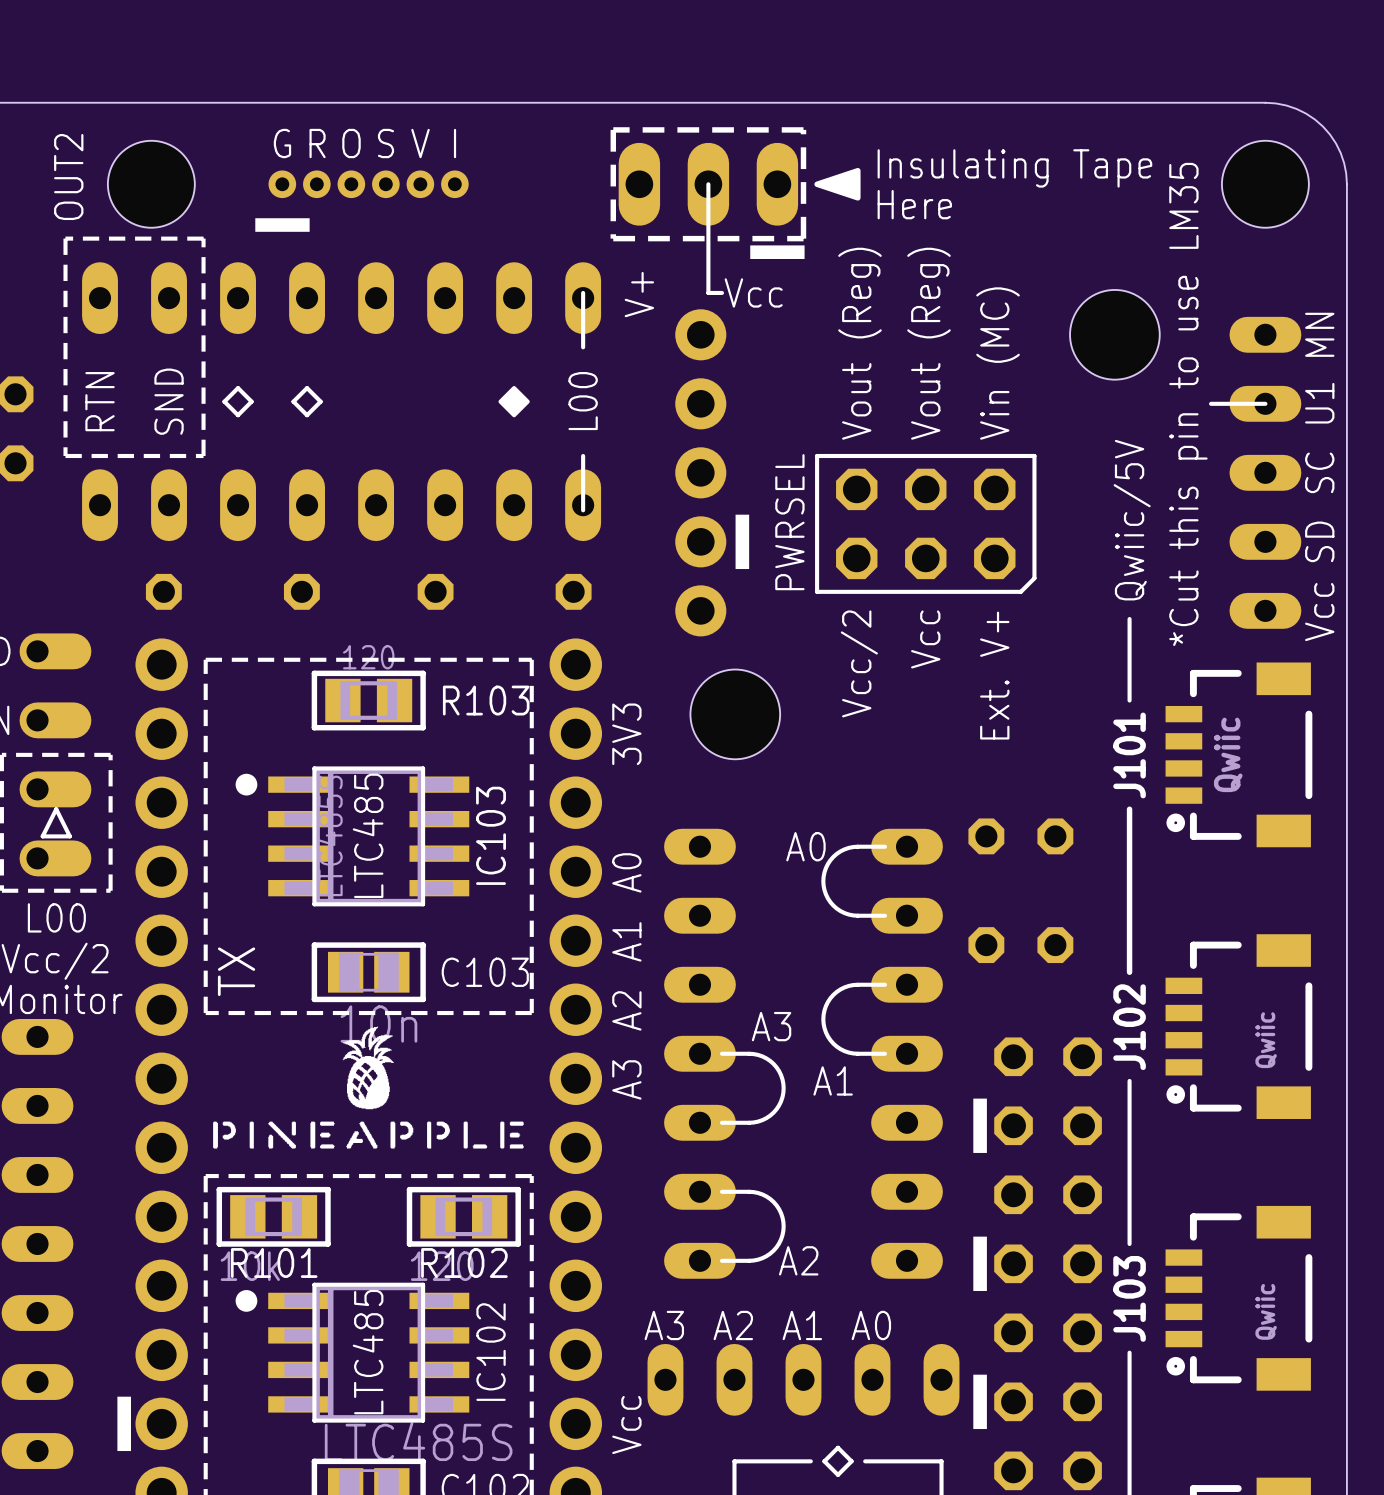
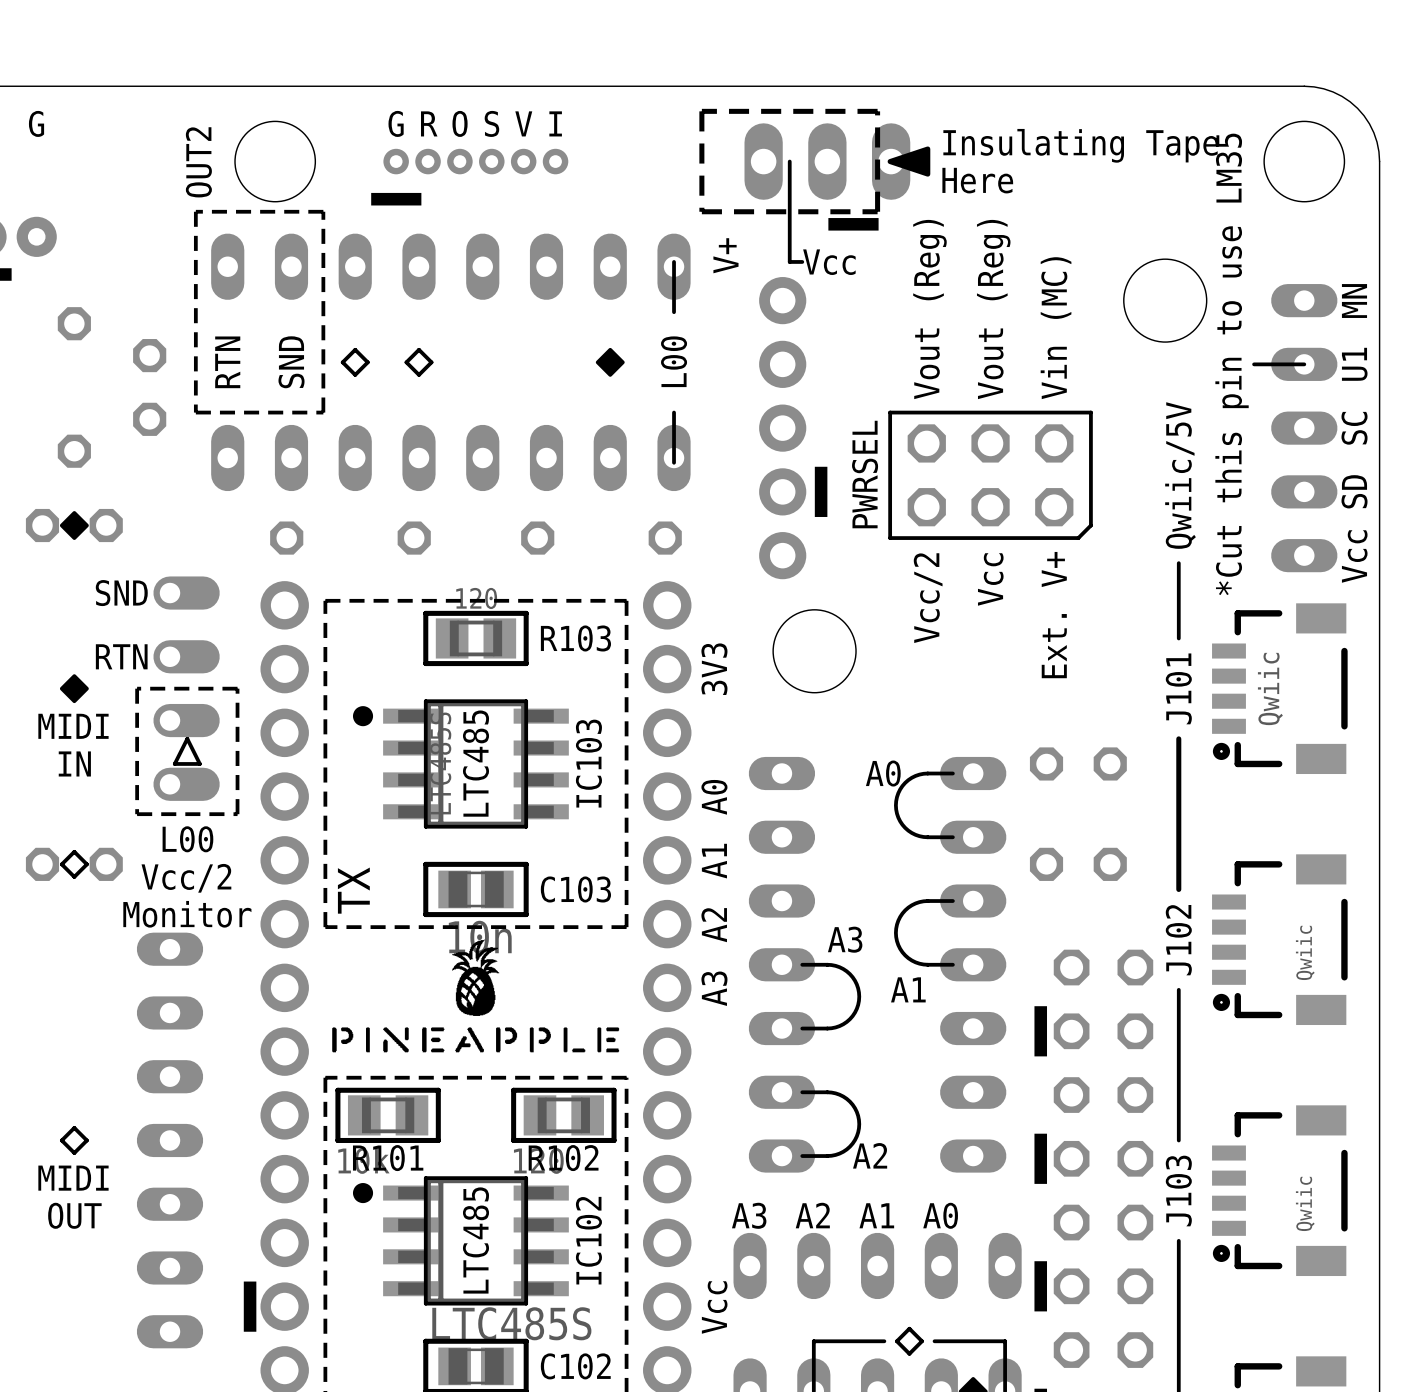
part position: (708, 184) -> (827, 161)

